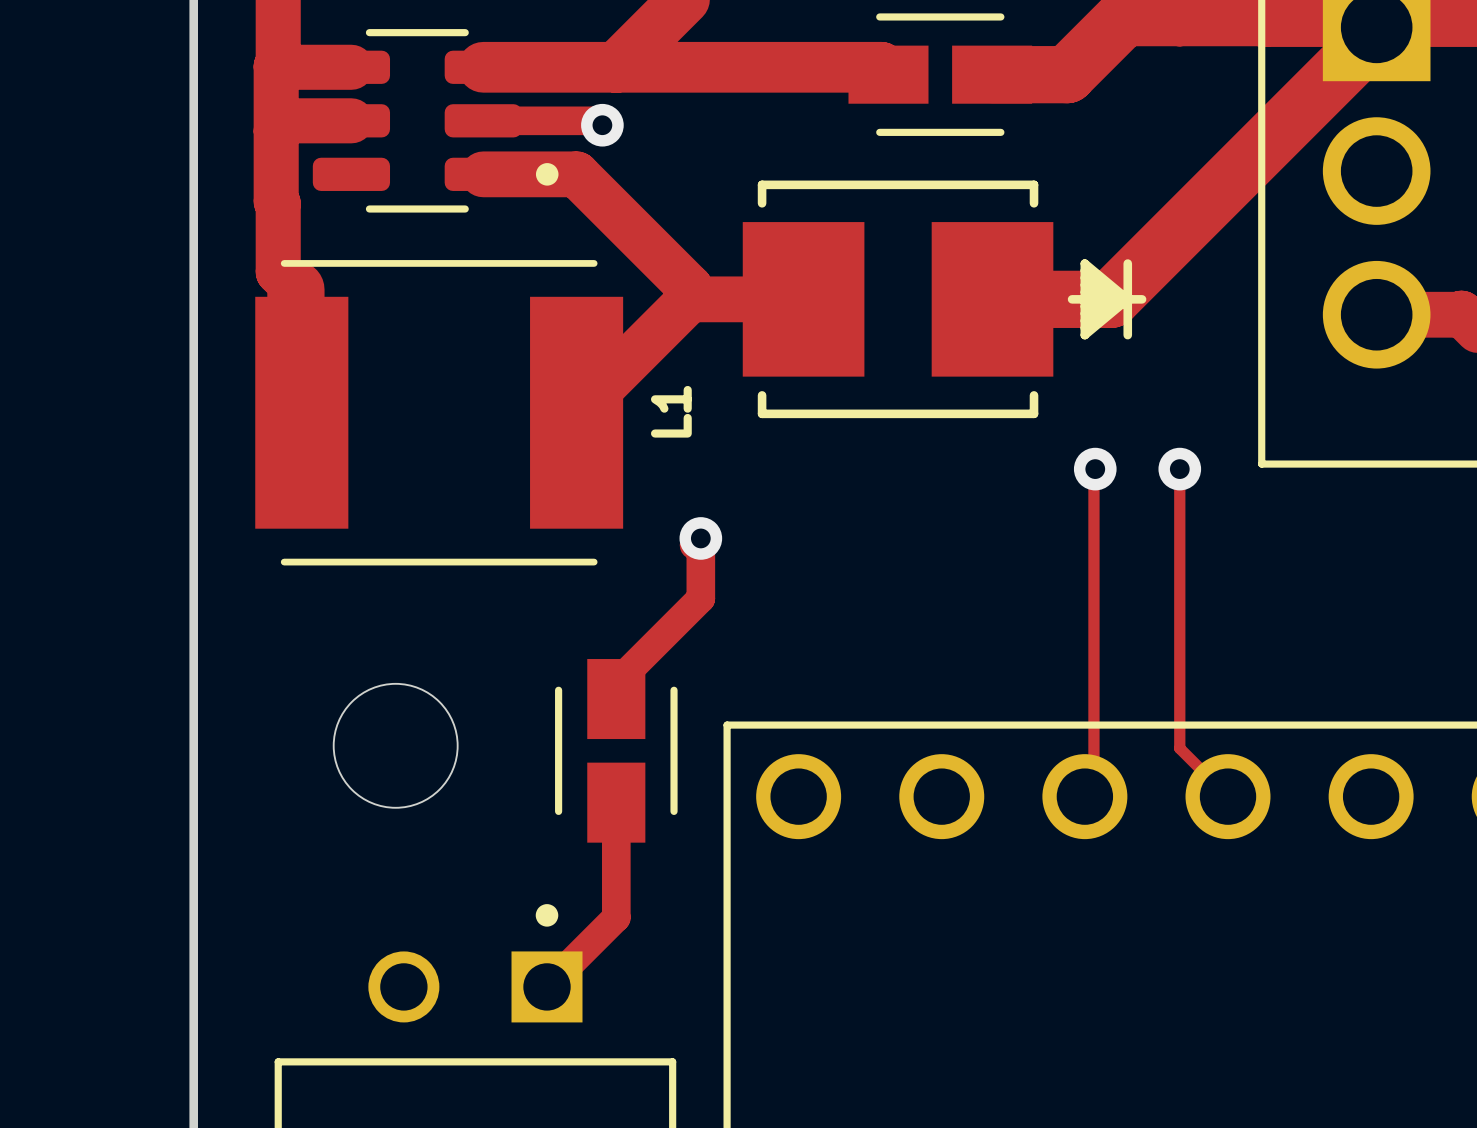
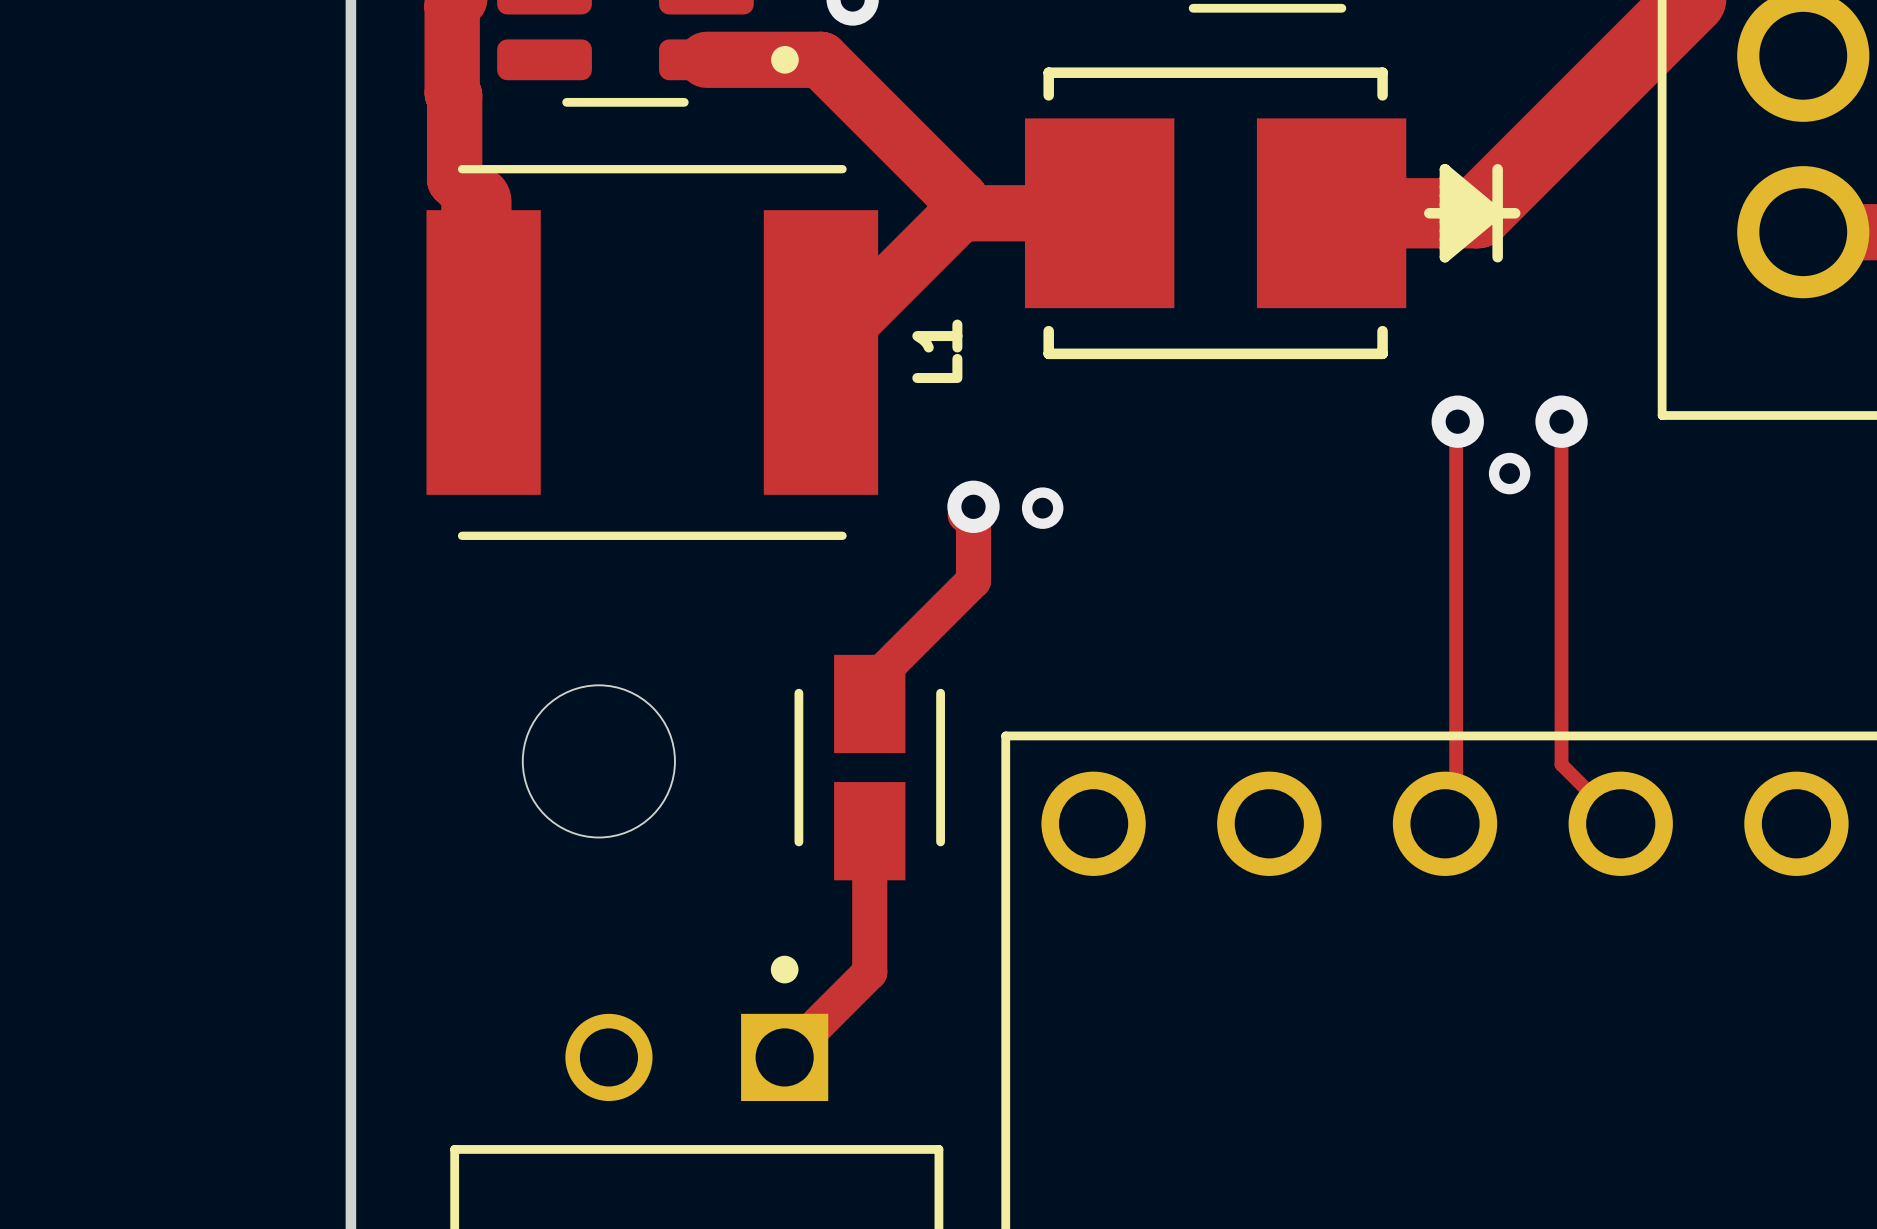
via: none -> (1509, 473)
via: none -> (1042, 508)

